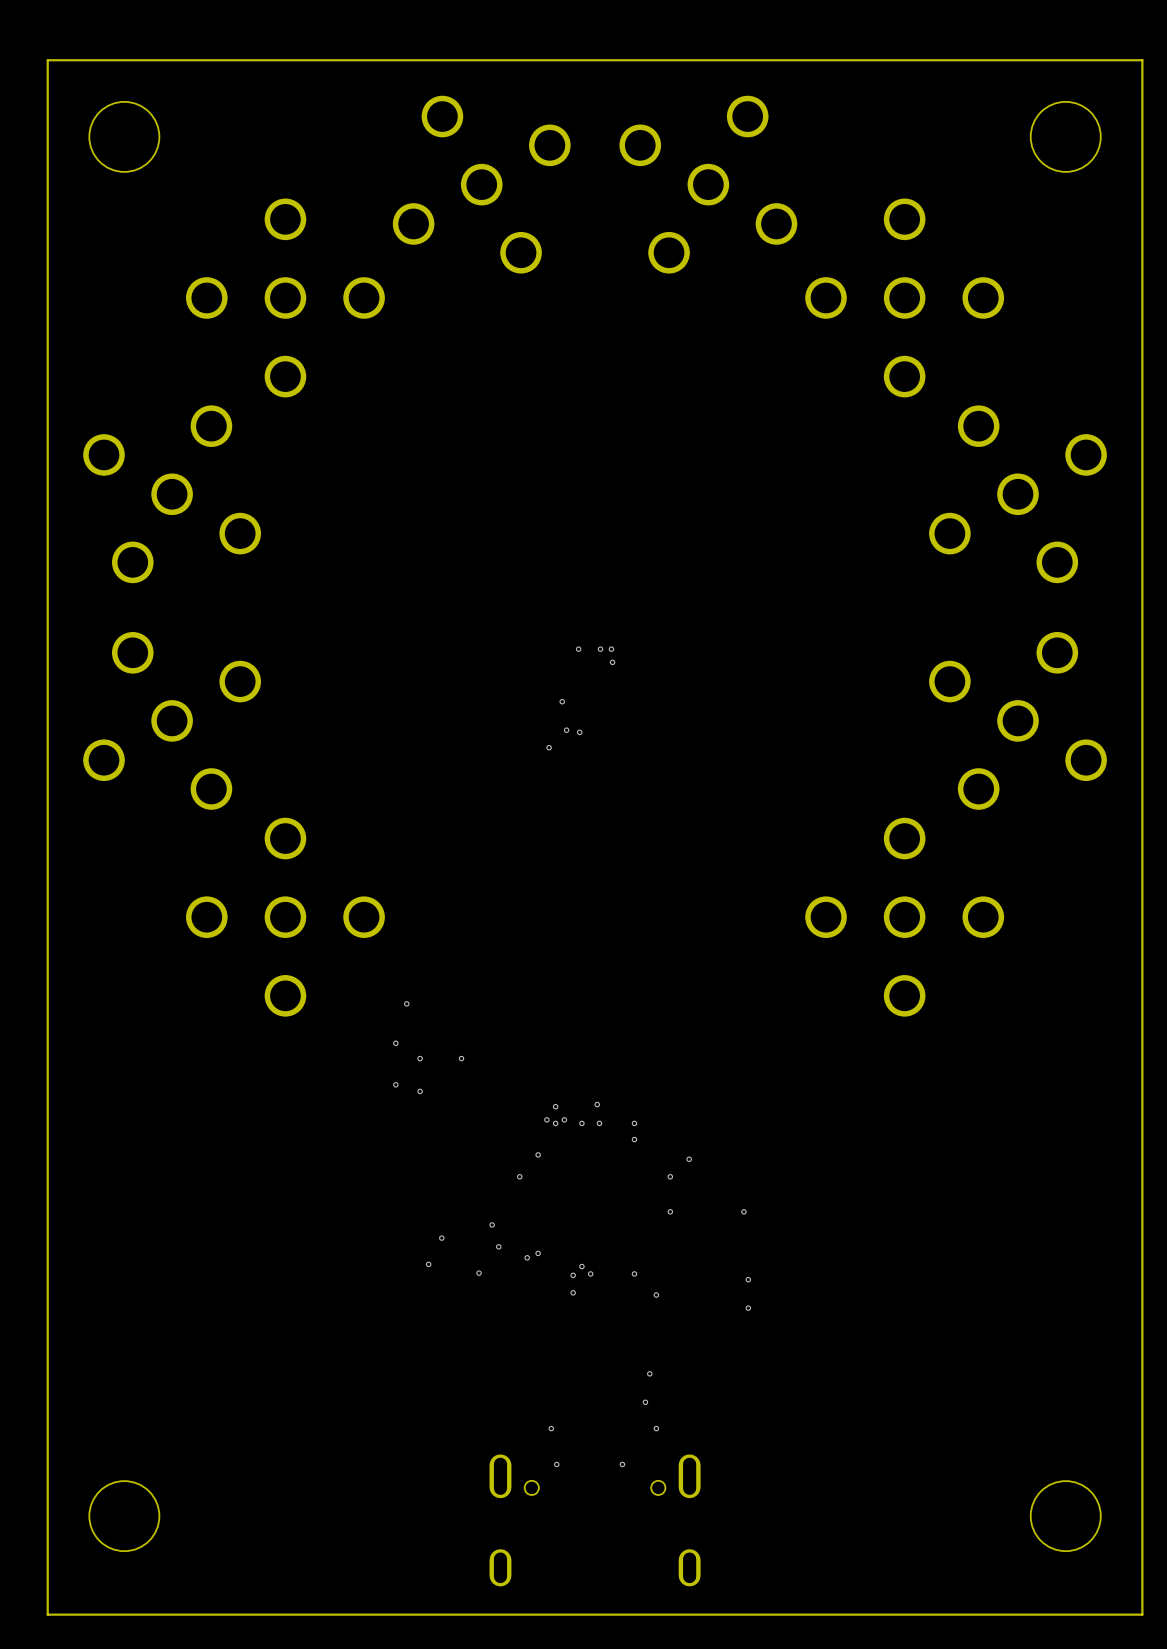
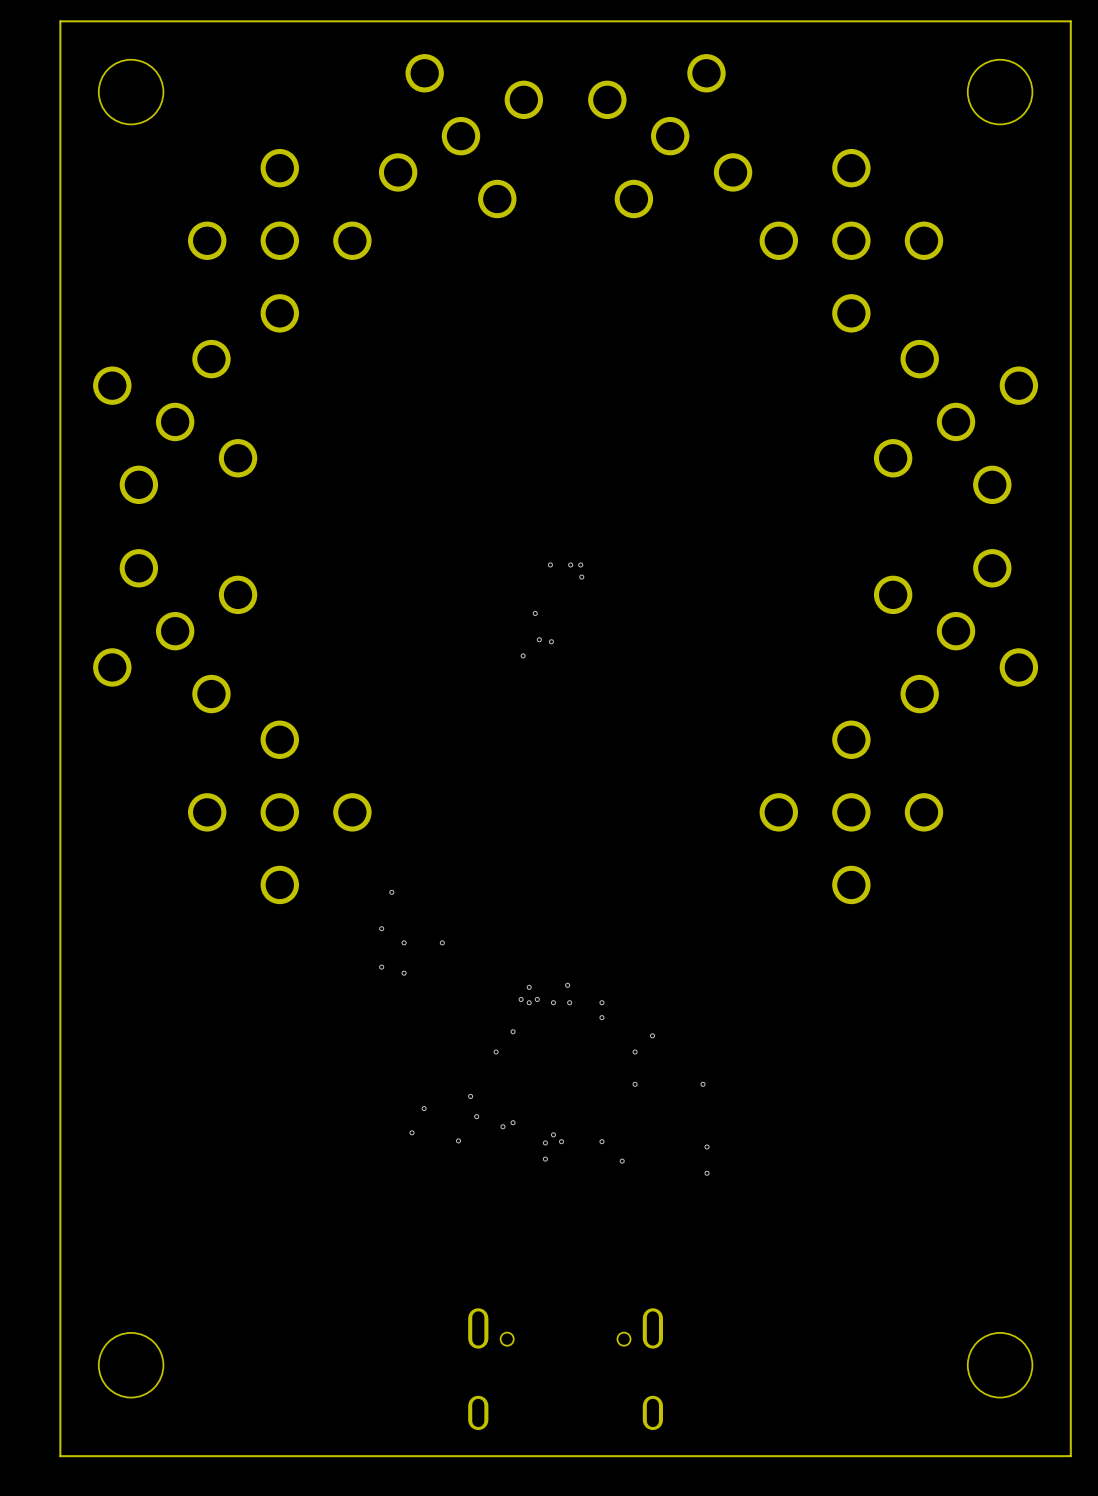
via: (649, 1373) -> none
via: (645, 1402) -> none
via: (551, 1428) -> none
via: (656, 1428) -> none
via: (556, 1464) -> none
via: (622, 1464) -> none

